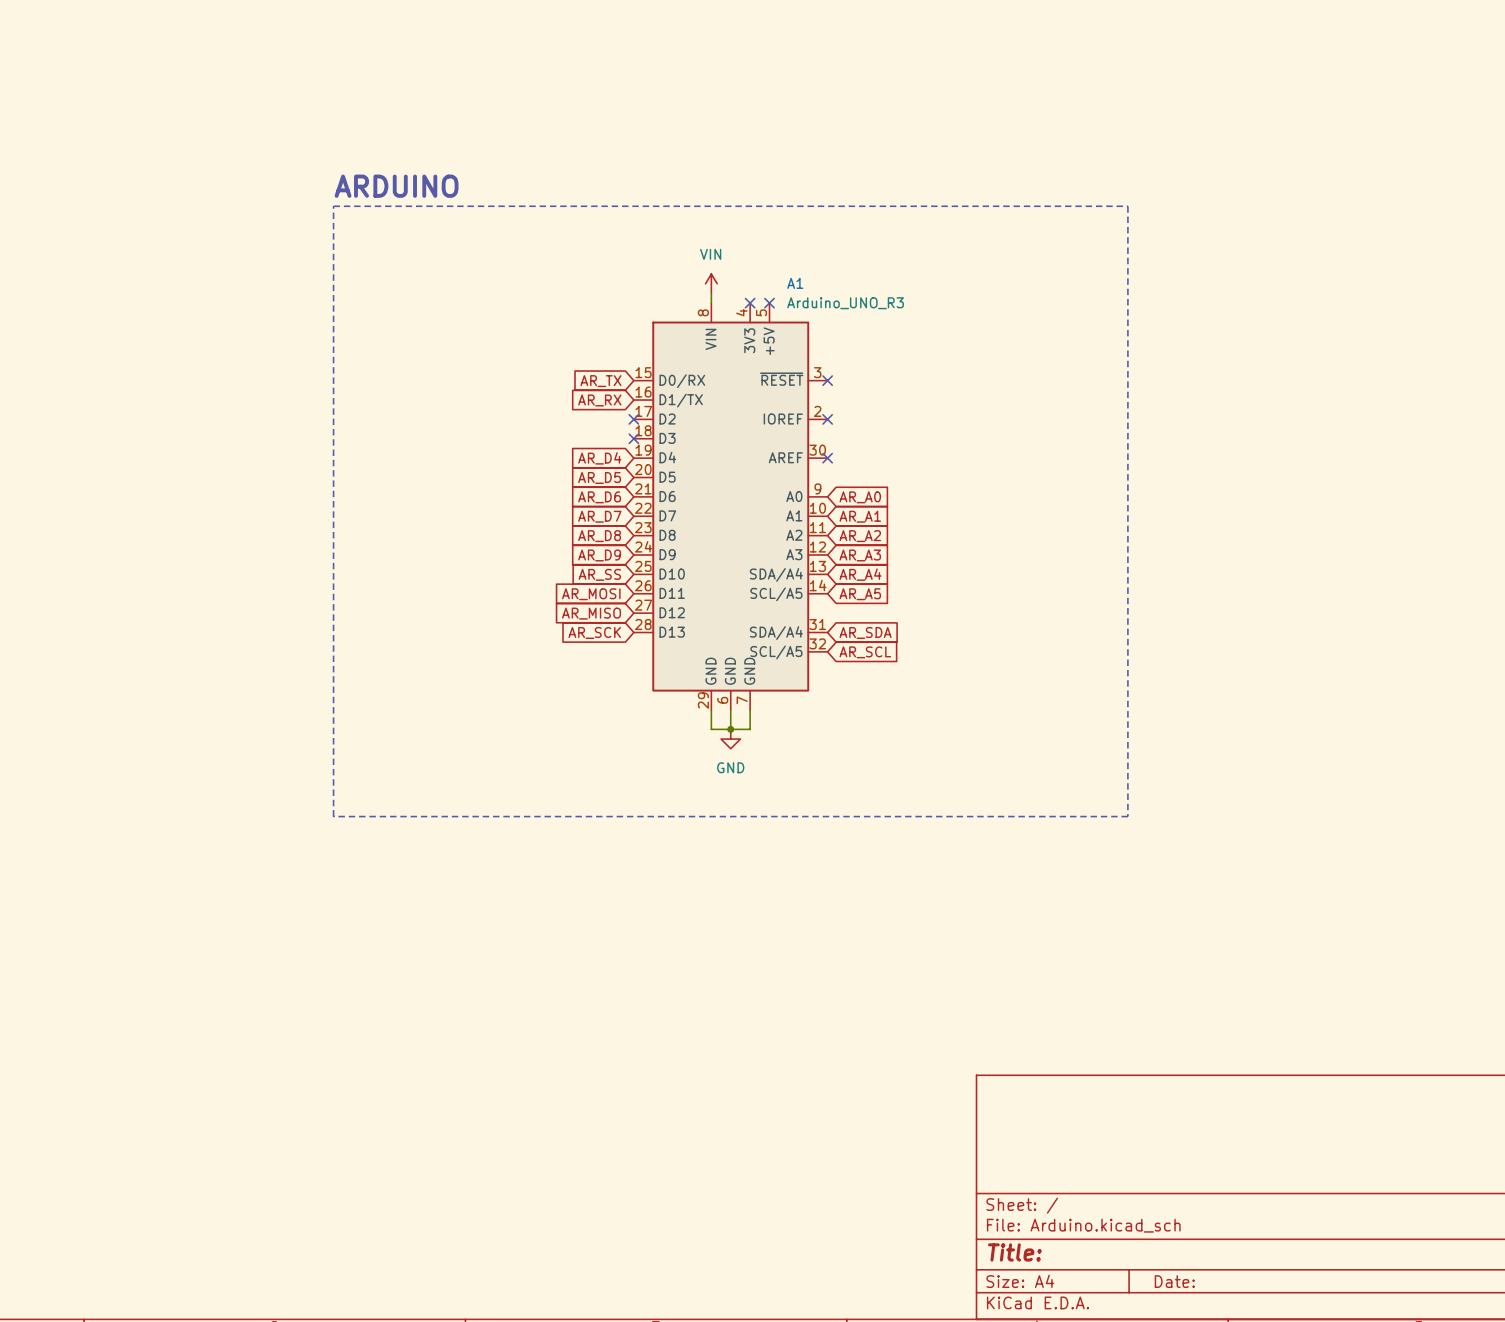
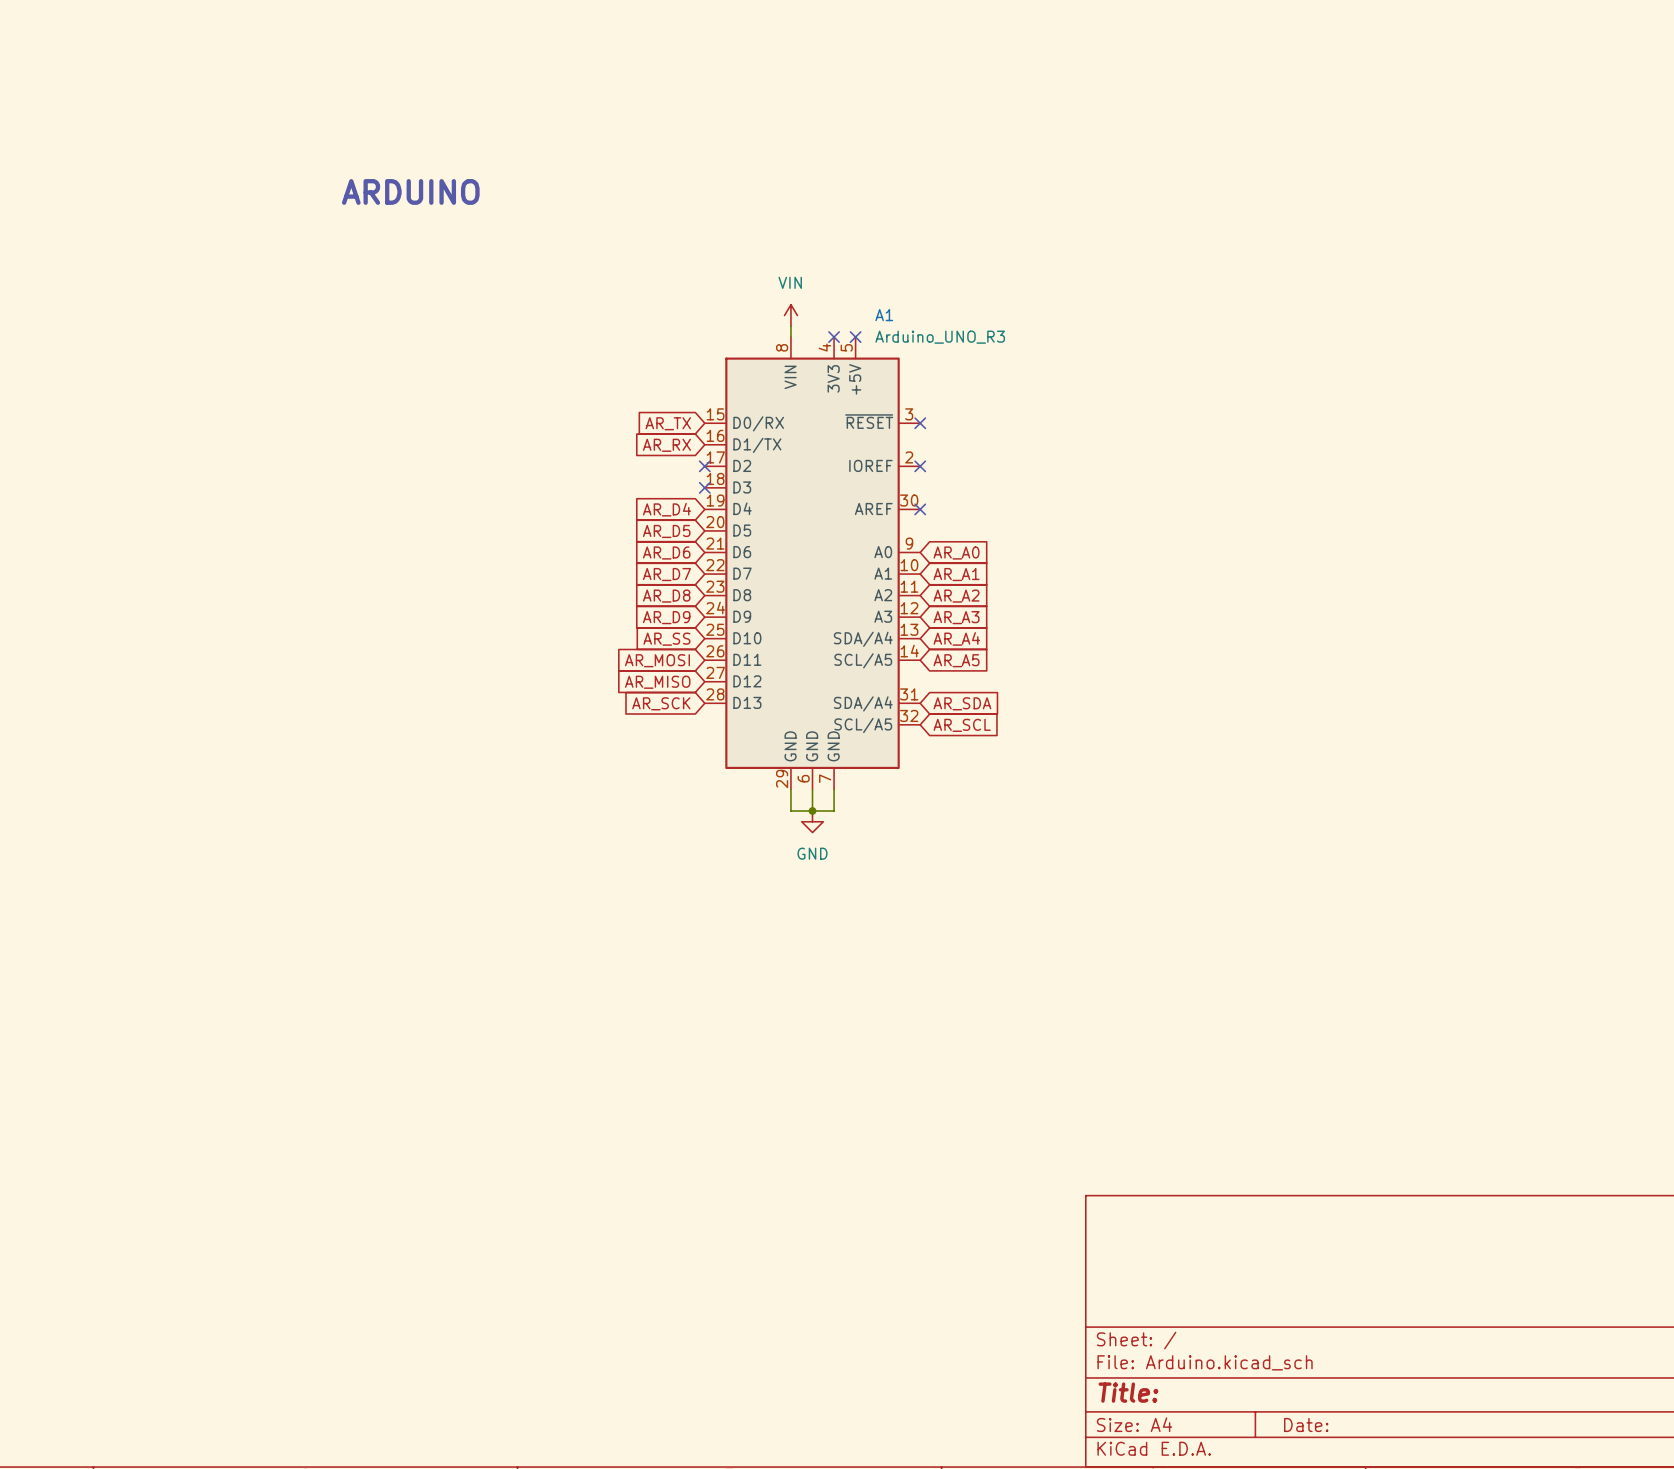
text position: ARDUINO (396, 186) -> ARDUINO (410, 191)
line: (333, 206) (1127, 206) (1127, 816) (333, 816) (333, 206) -> none

